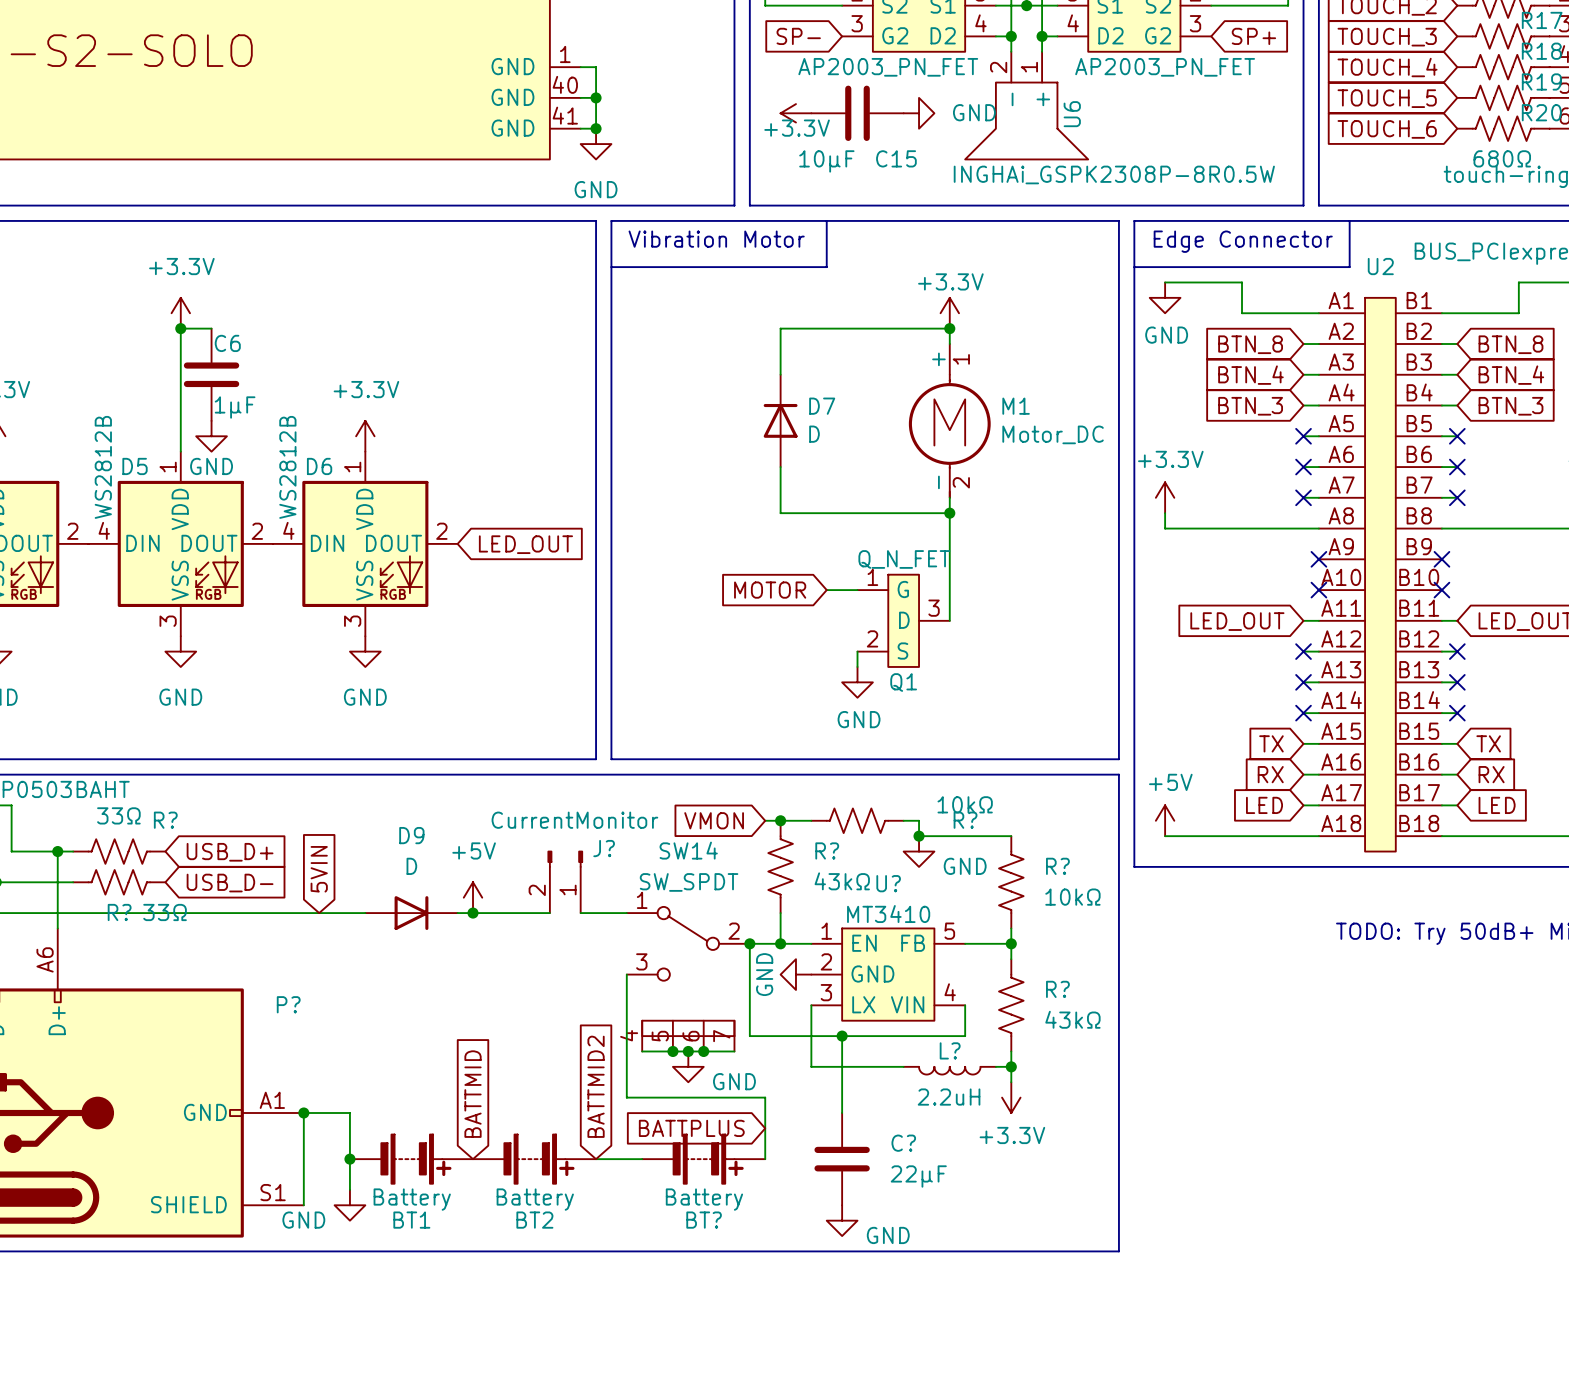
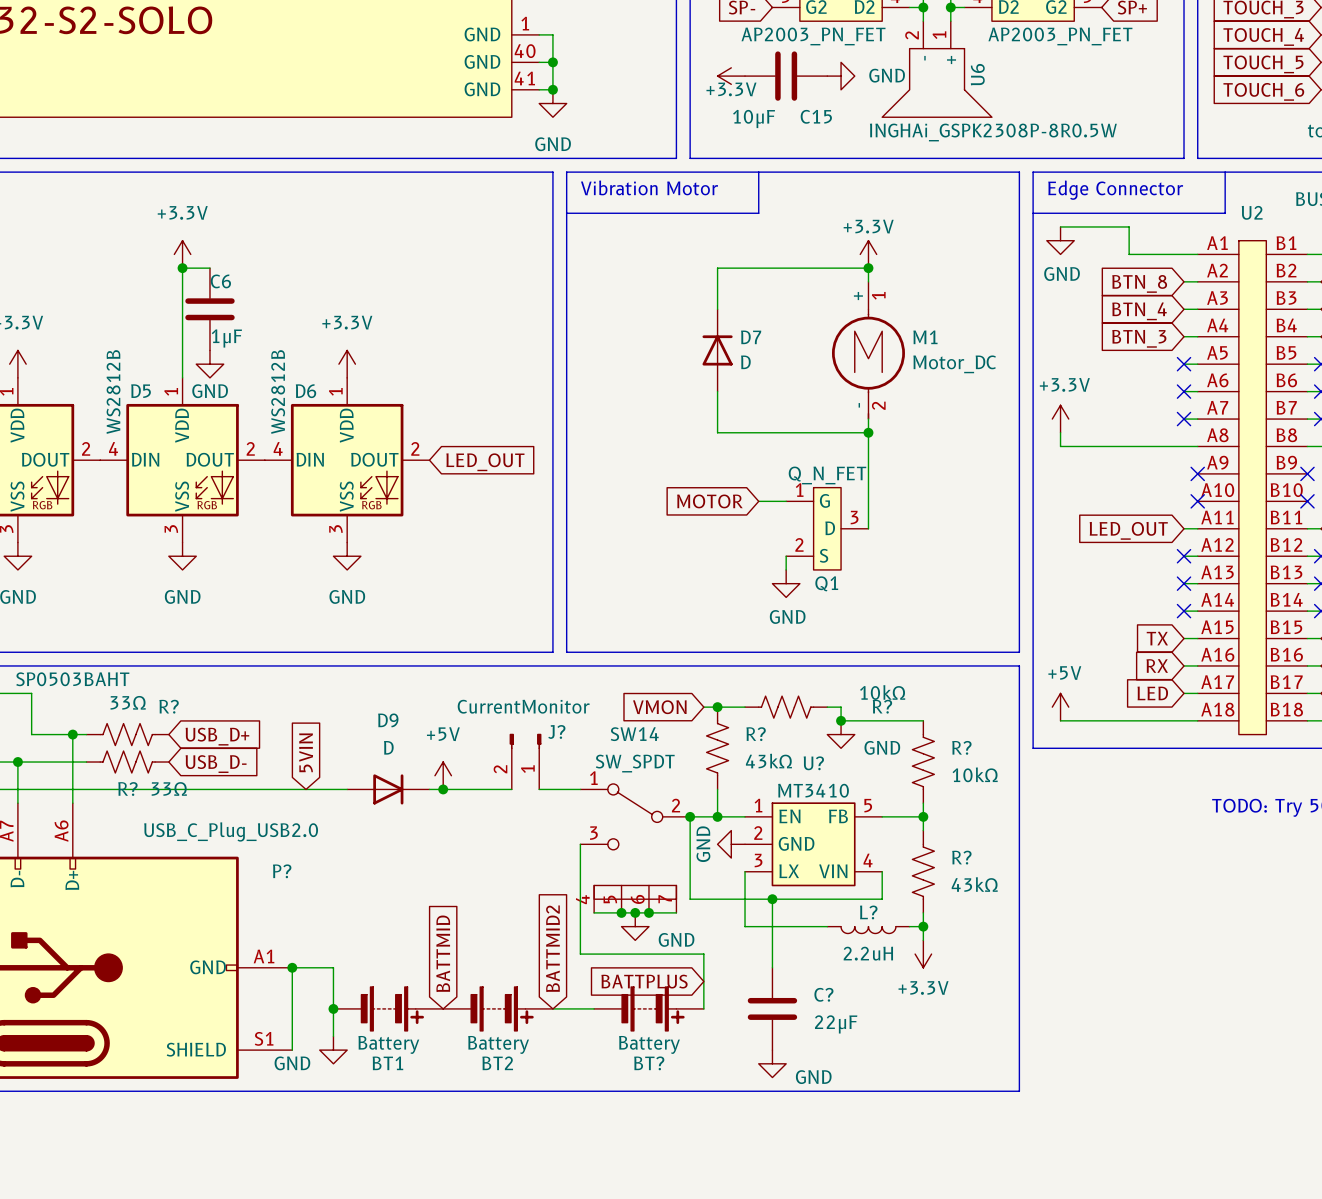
P? value: none -> USB_C_Plug_USB2.0 (231, 831)

